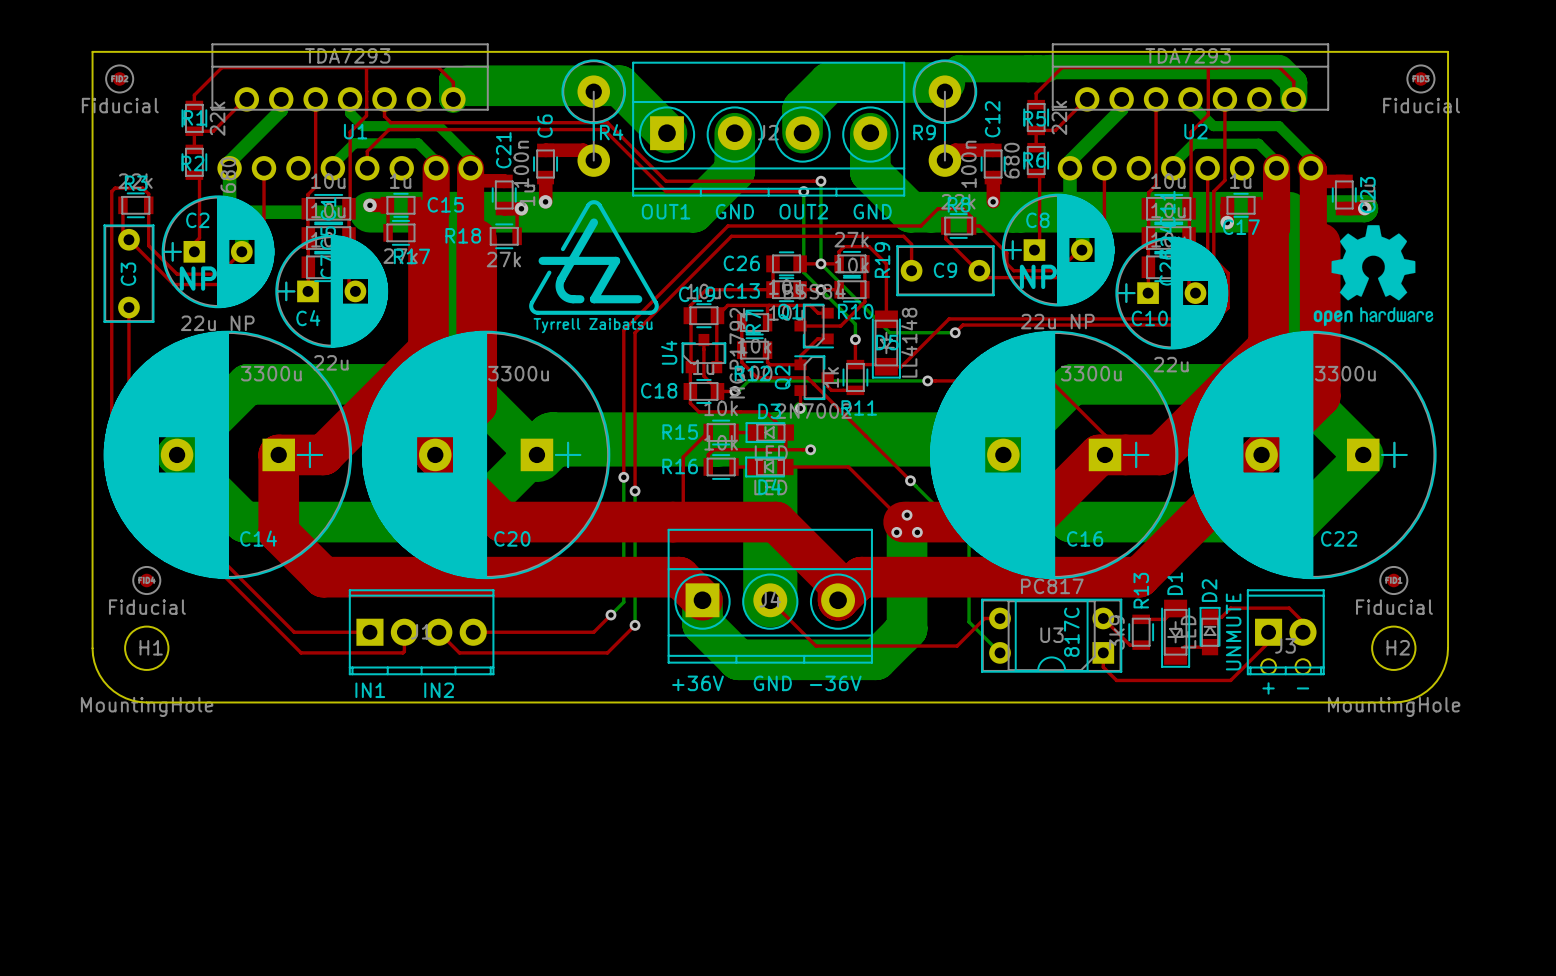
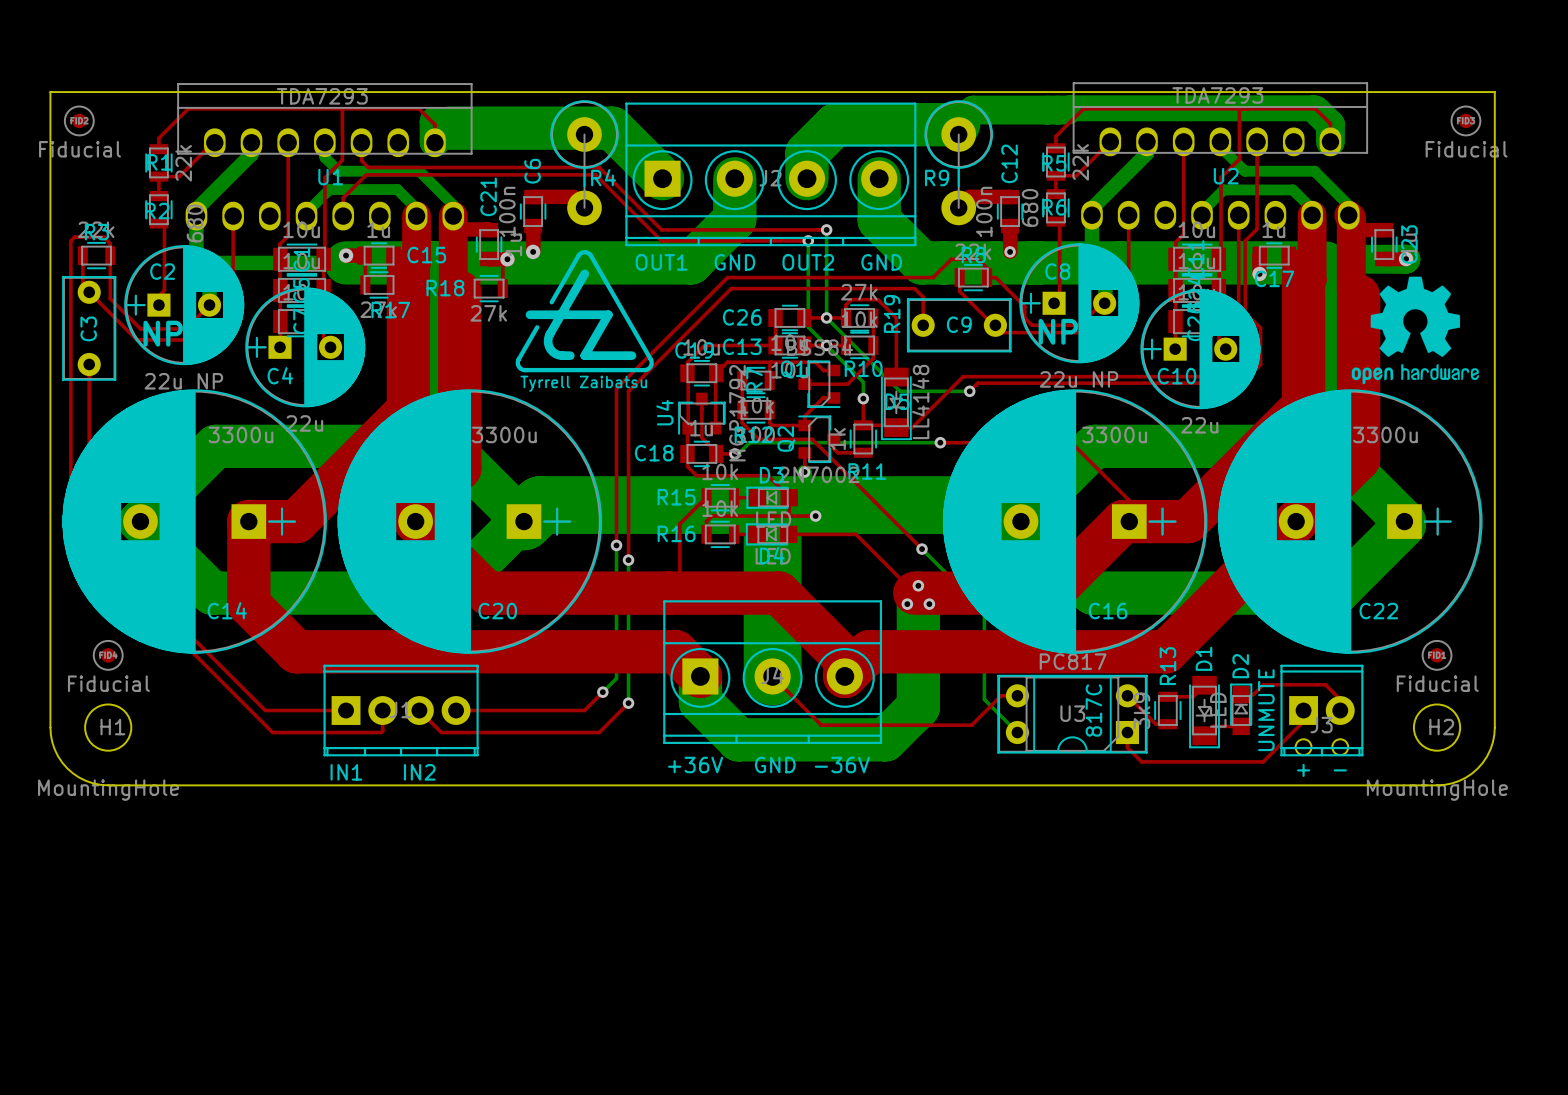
U1 footprint: [211, 43, 489, 181] -> [177, 83, 473, 231]
U2 footprint: [1051, 43, 1330, 181] -> [1072, 82, 1368, 230]

